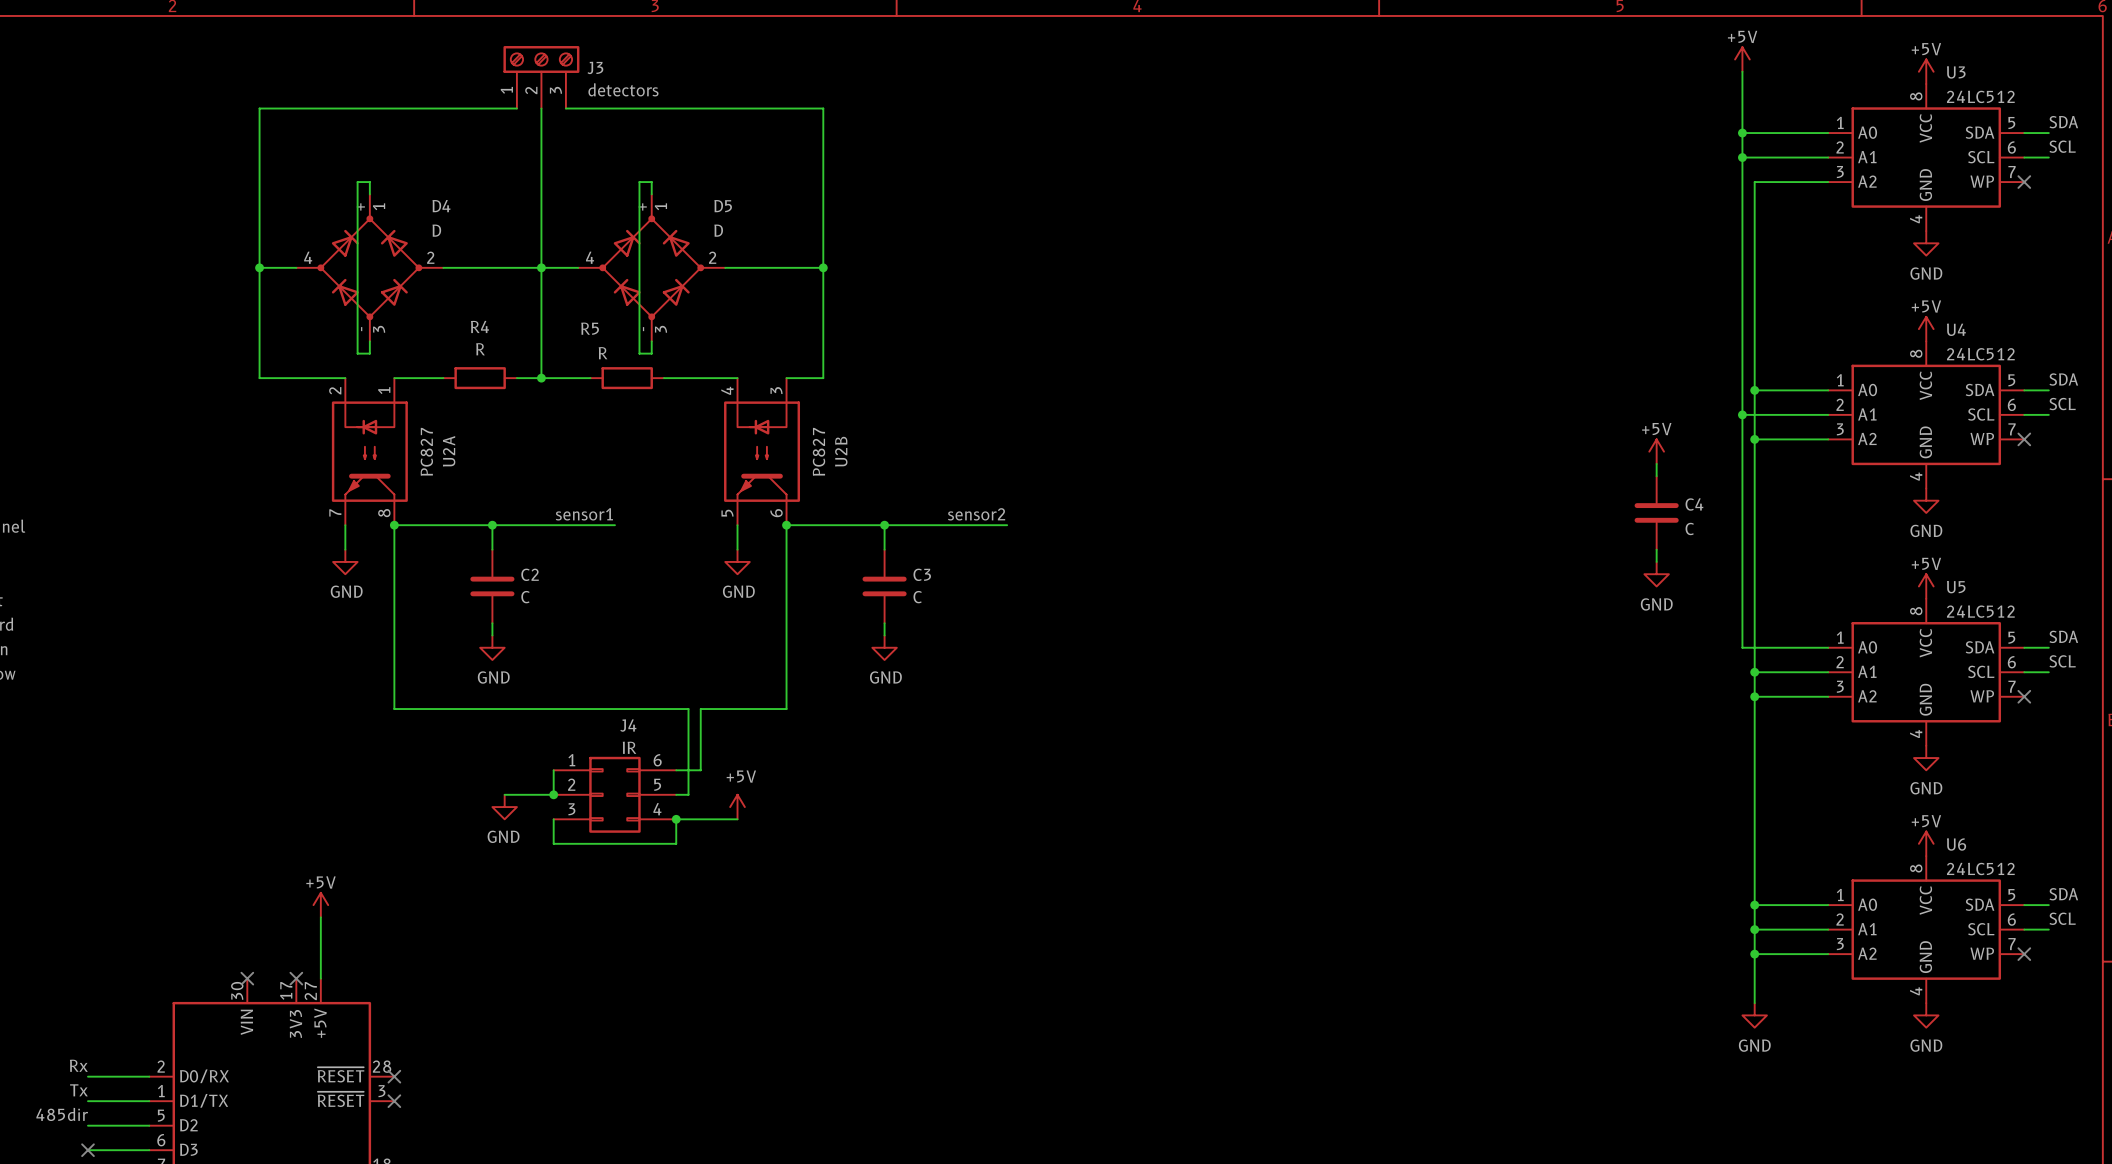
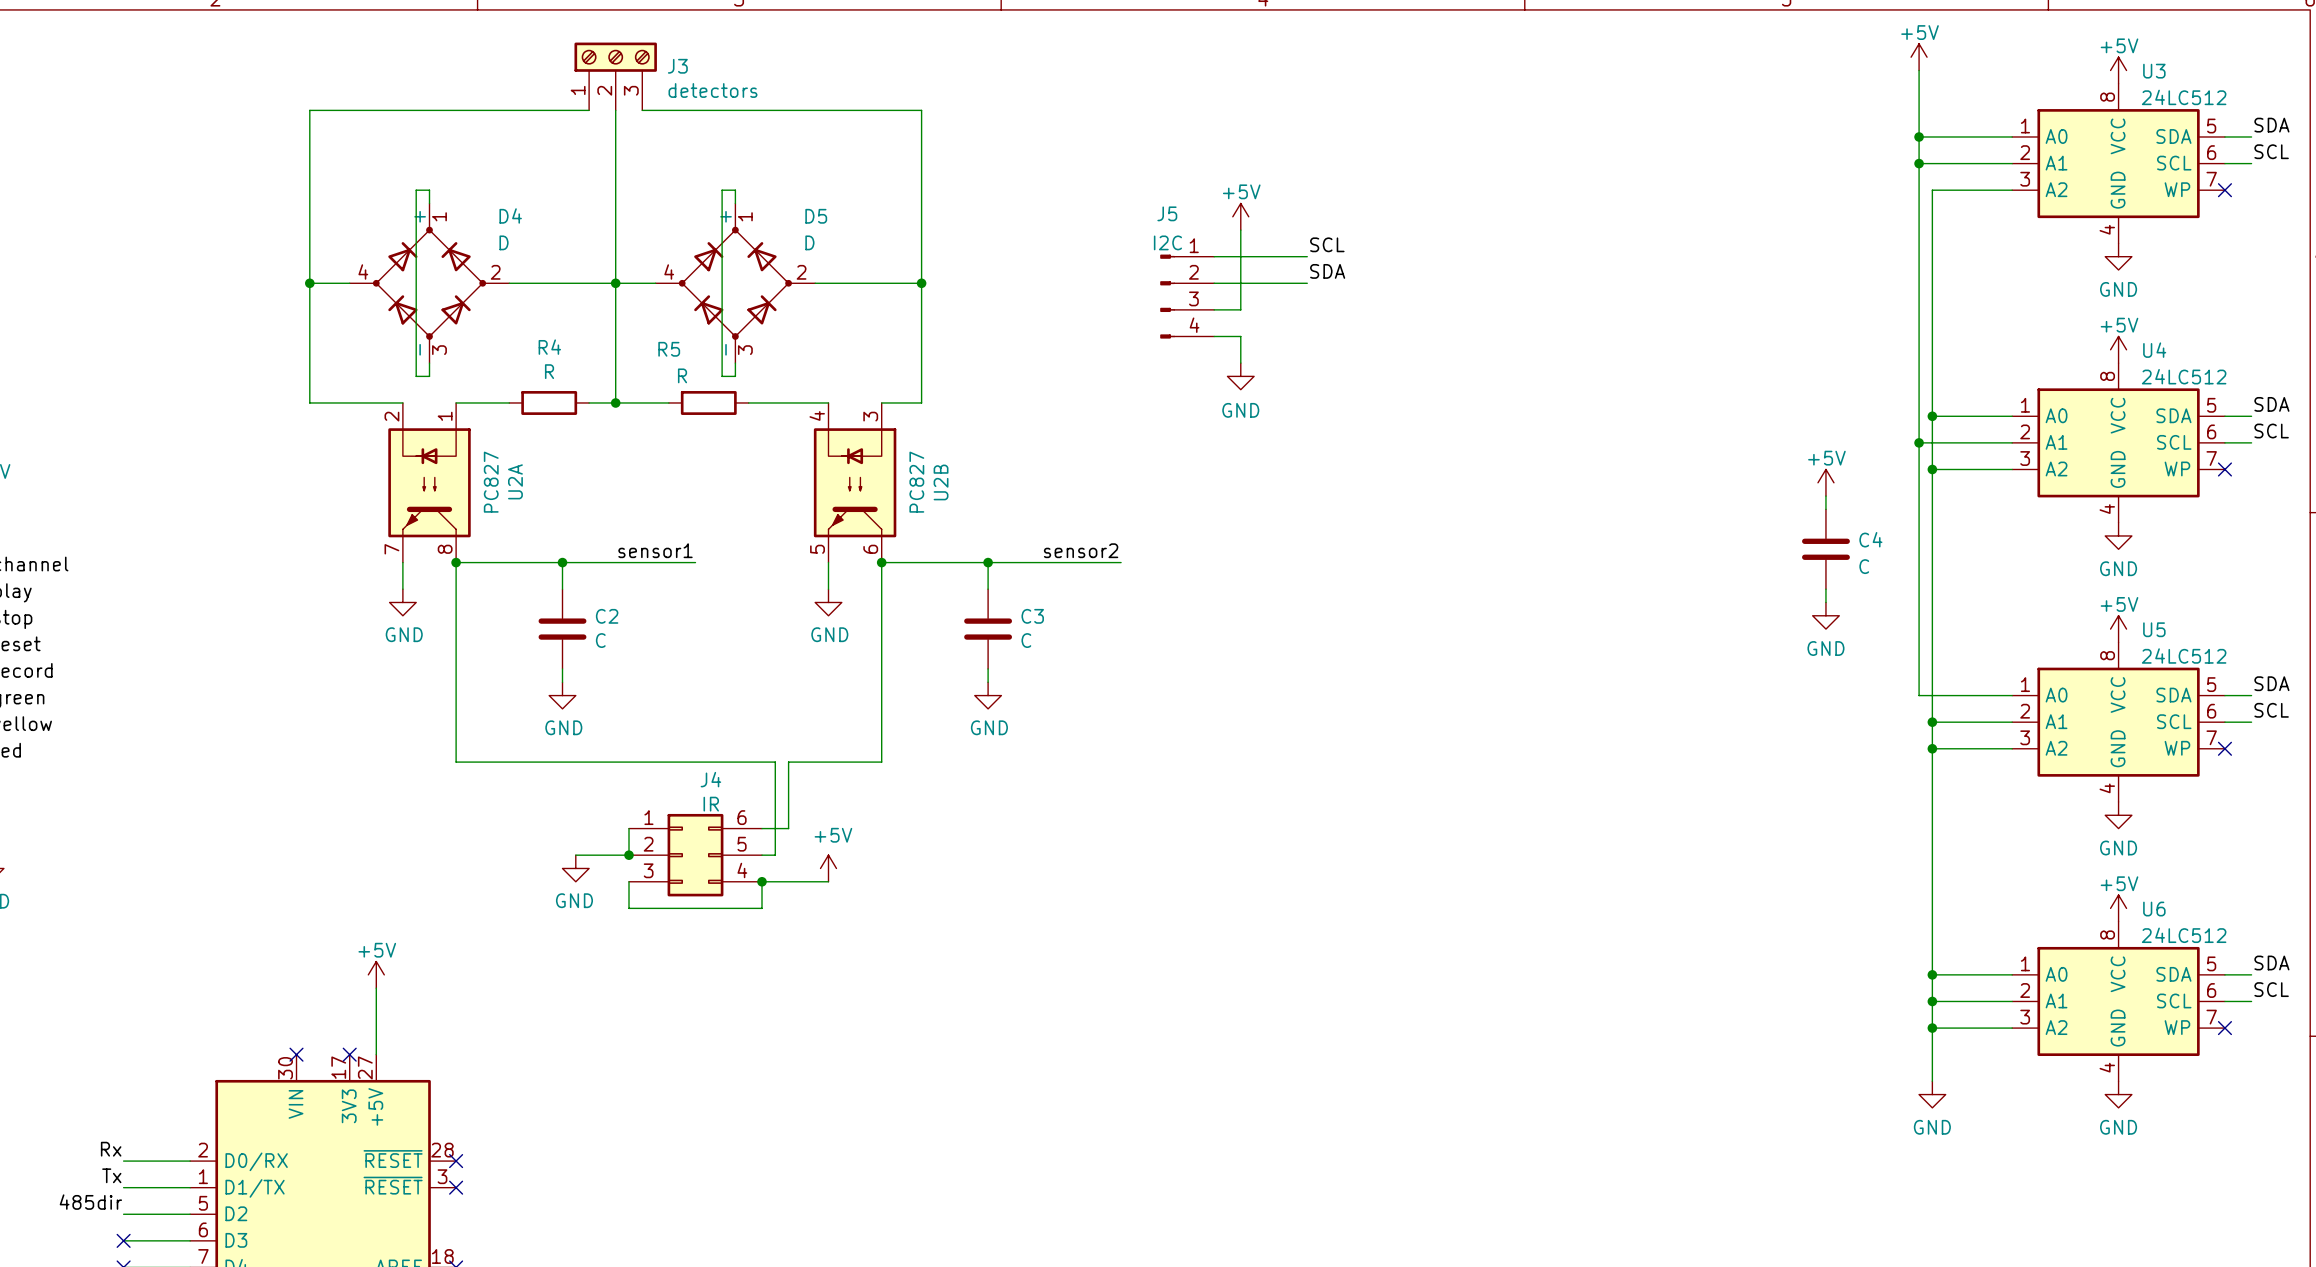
power symbol: none -> +5V (1240, 216)
wire: none -> (1240, 230) (1240, 309) (1214, 309)
label: none -> SCL (1327, 244)
wire: none -> (1214, 256) (1307, 256)
label: none -> SDA (1327, 271)
wire: none -> (1214, 283) (1307, 283)
J5: none -> I2C (1187, 296)
wire: none -> (1214, 336) (1240, 336) (1240, 363)
power symbol: none -> GND (1240, 376)

